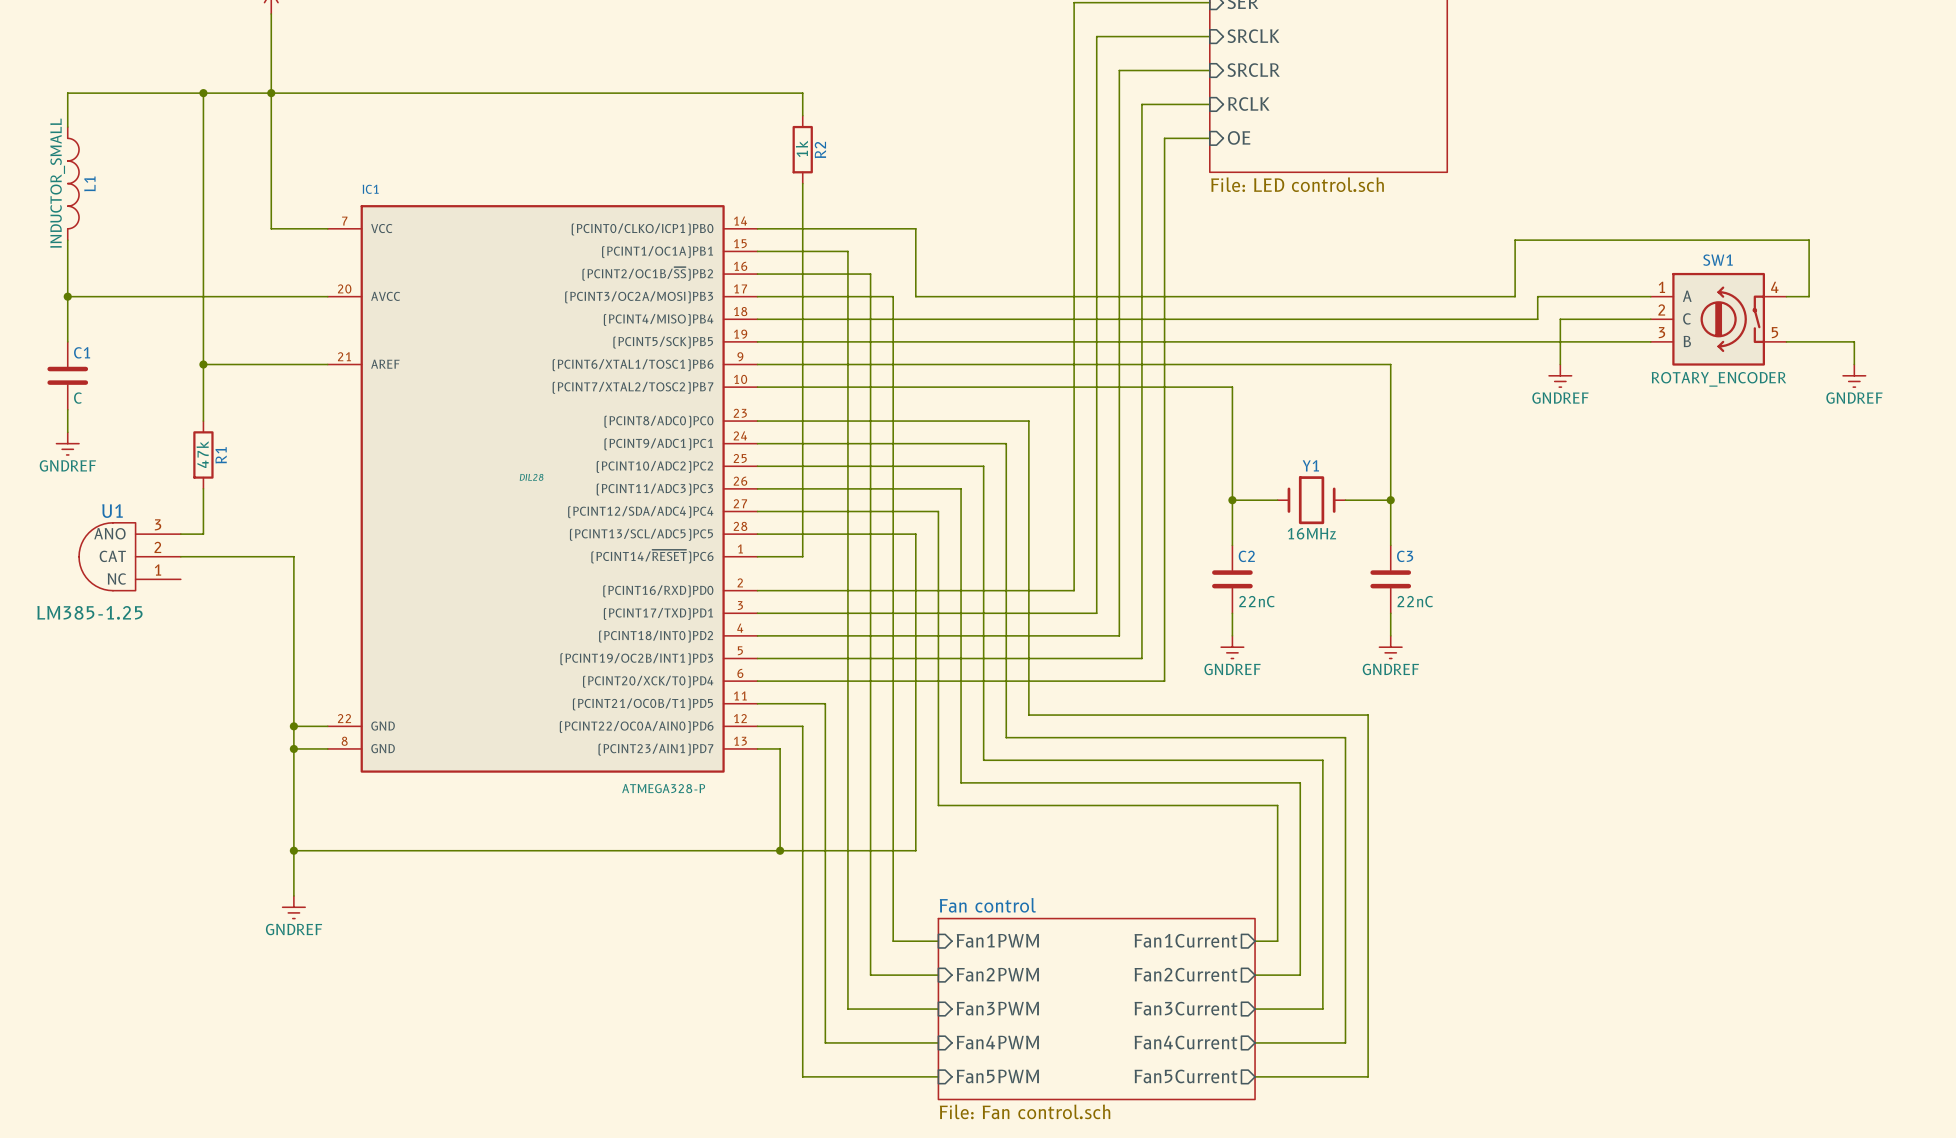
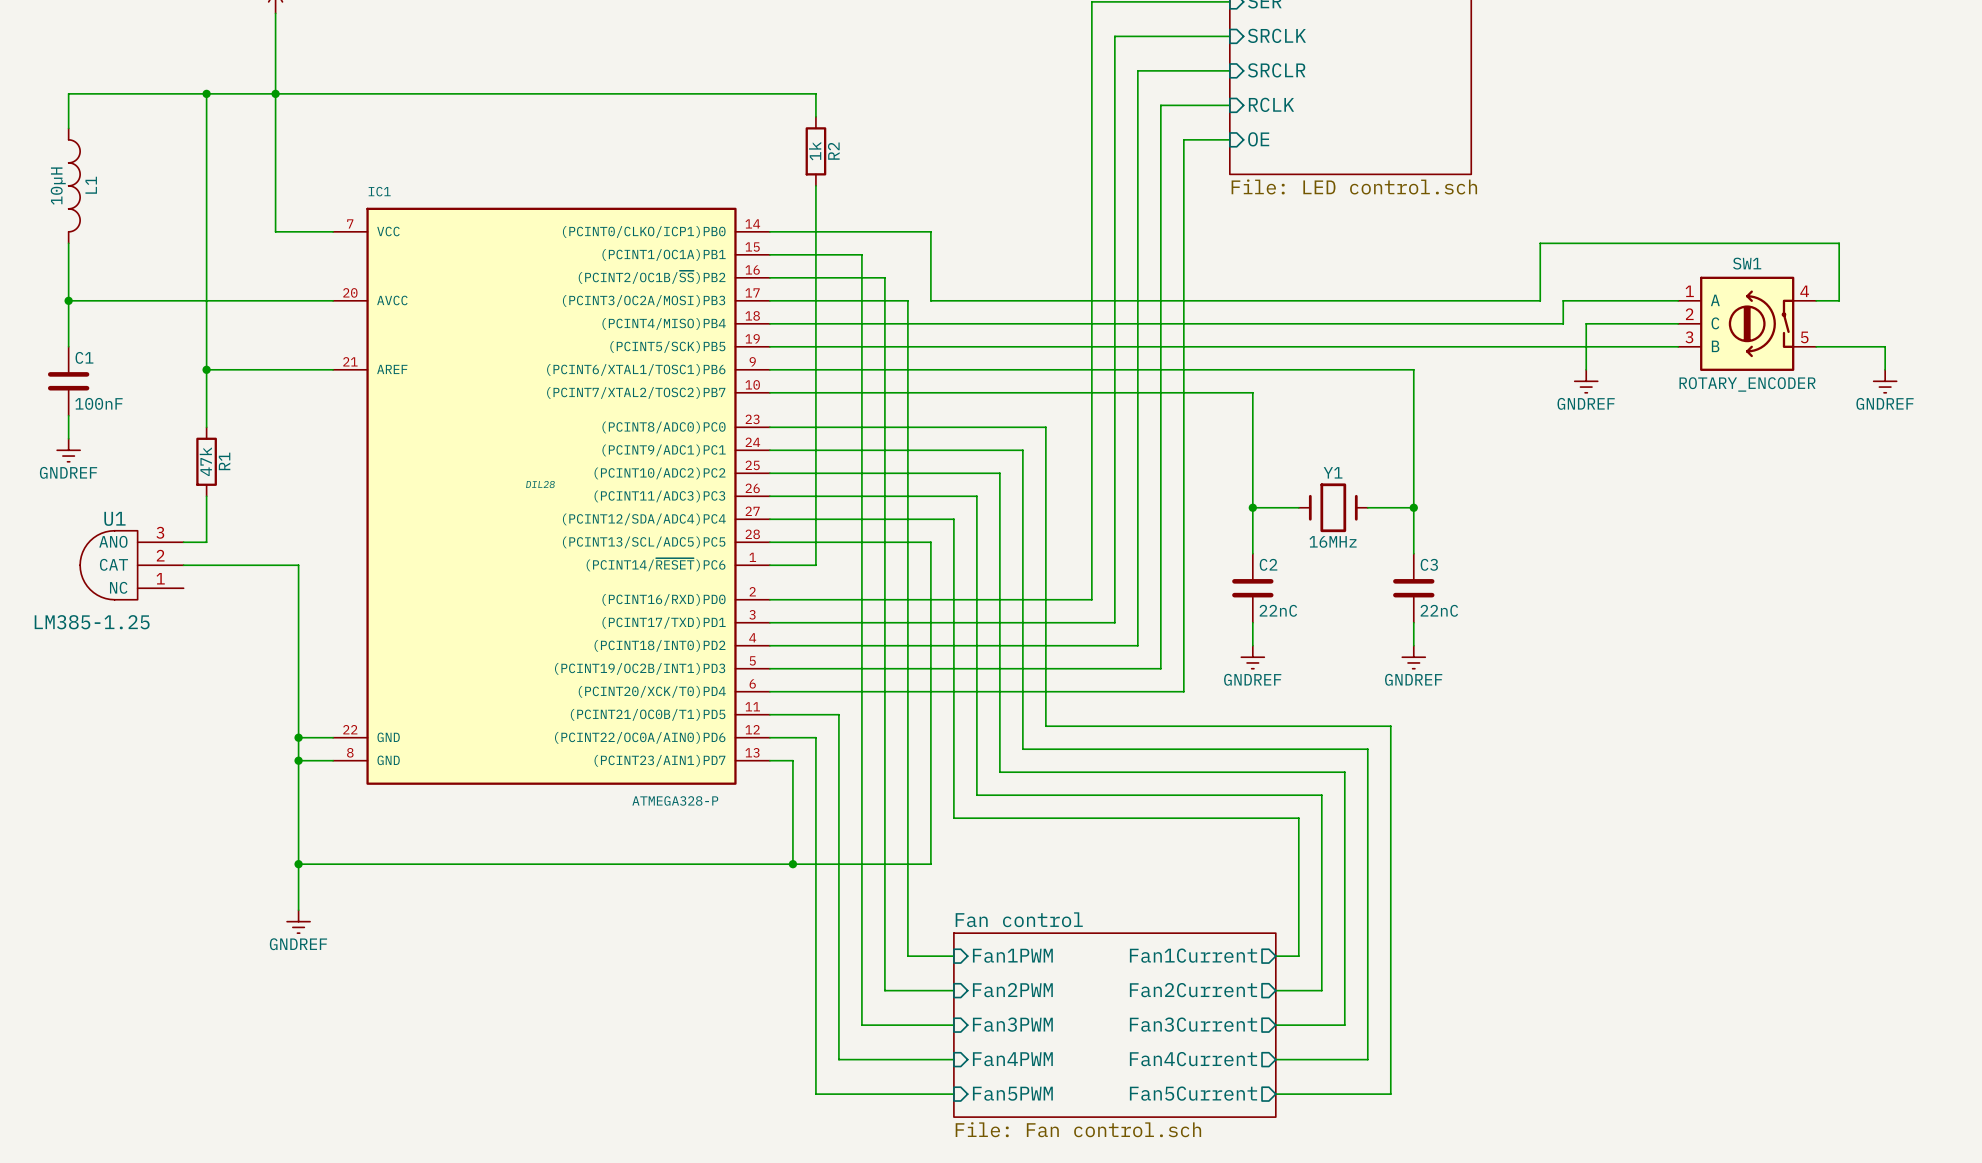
L1 value: INDUCTOR_SMALL (57, 183) -> 10µH (58, 186)
C1 value: C (77, 398) -> 100nF (98, 403)

